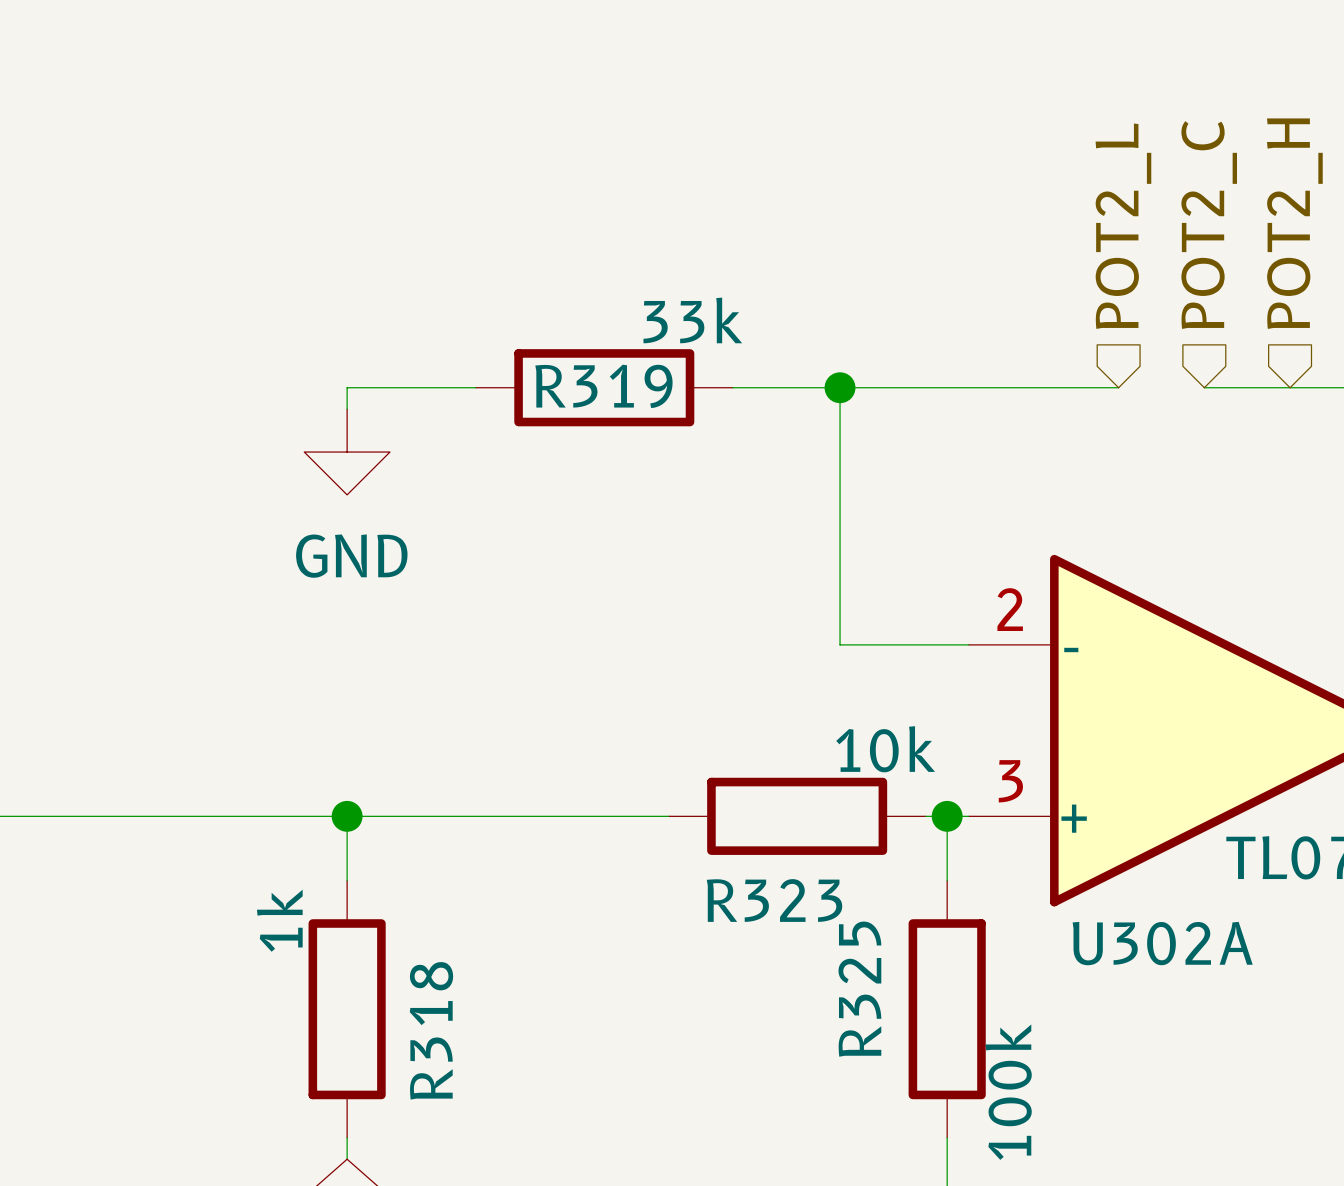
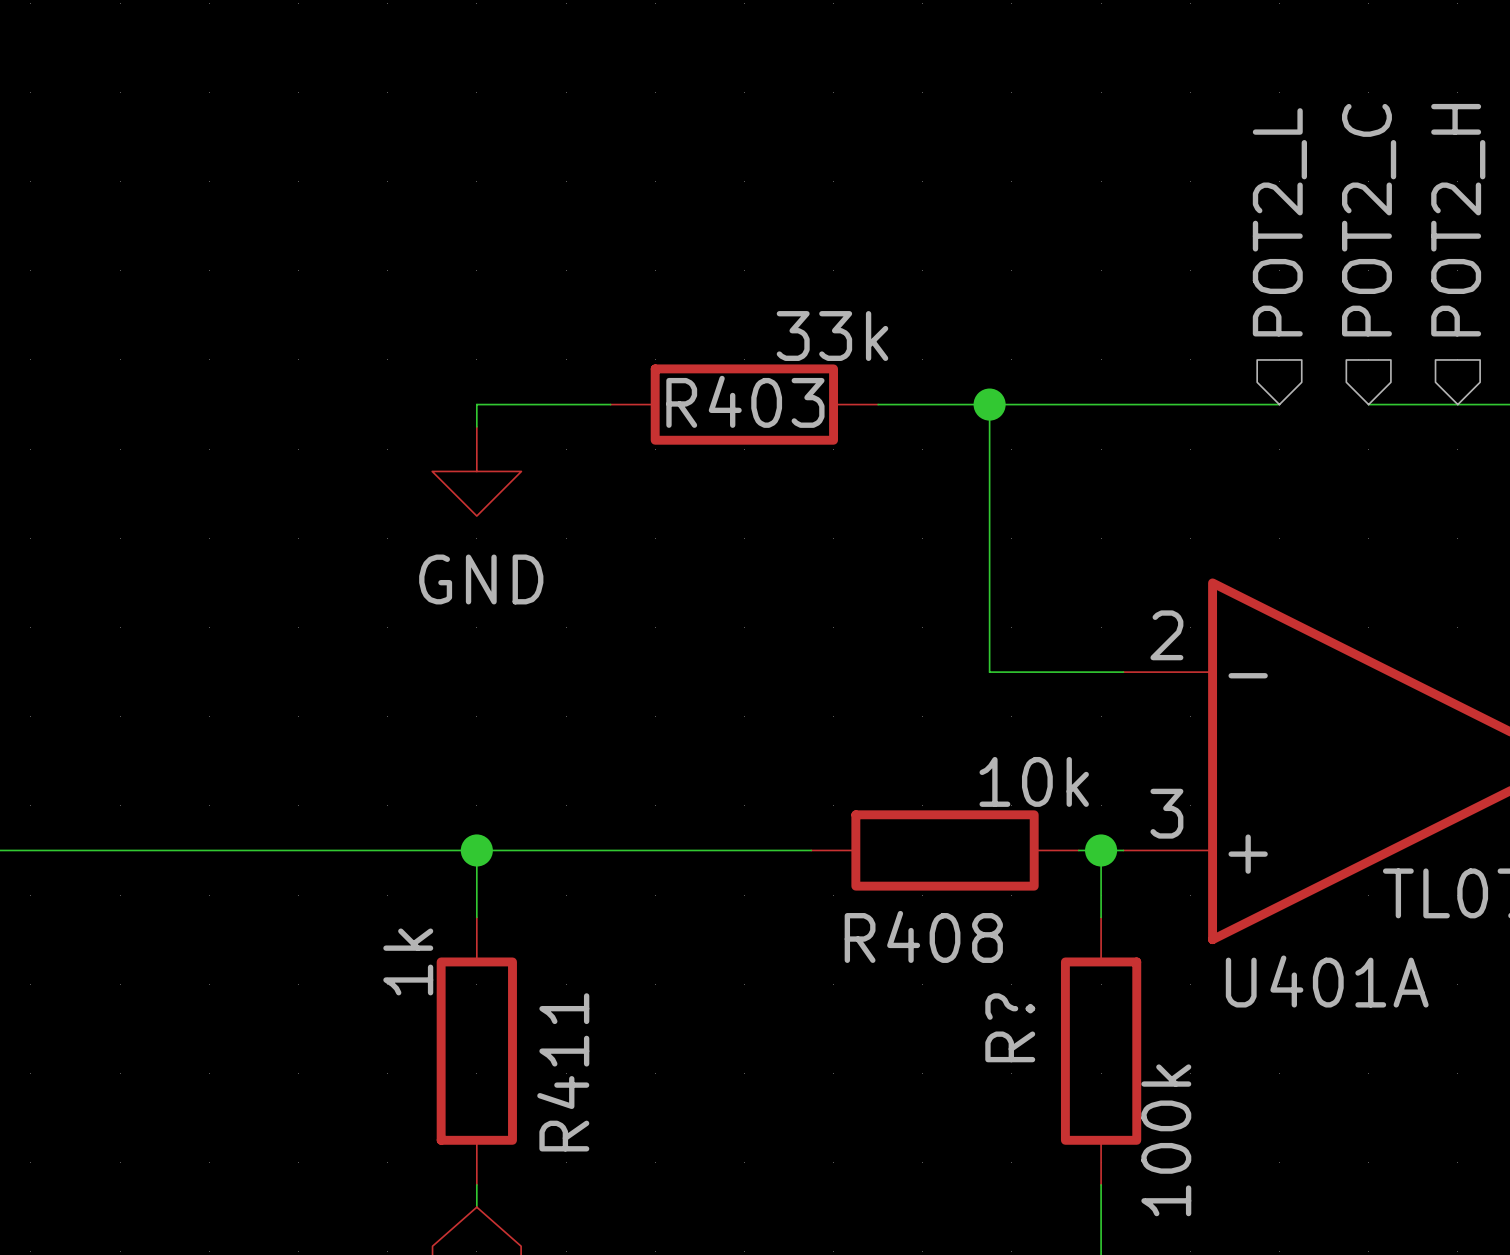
R319 name: R319 (603, 386) -> R403 (745, 401)
R323 name: R323 (774, 900) -> R408 (923, 936)
U302A name: U302A (1162, 943) -> U401A (1327, 981)
R325 name: R325 (859, 989) -> R? (1010, 1027)
R318 name: R318 (431, 1030) -> R411 (563, 1072)

